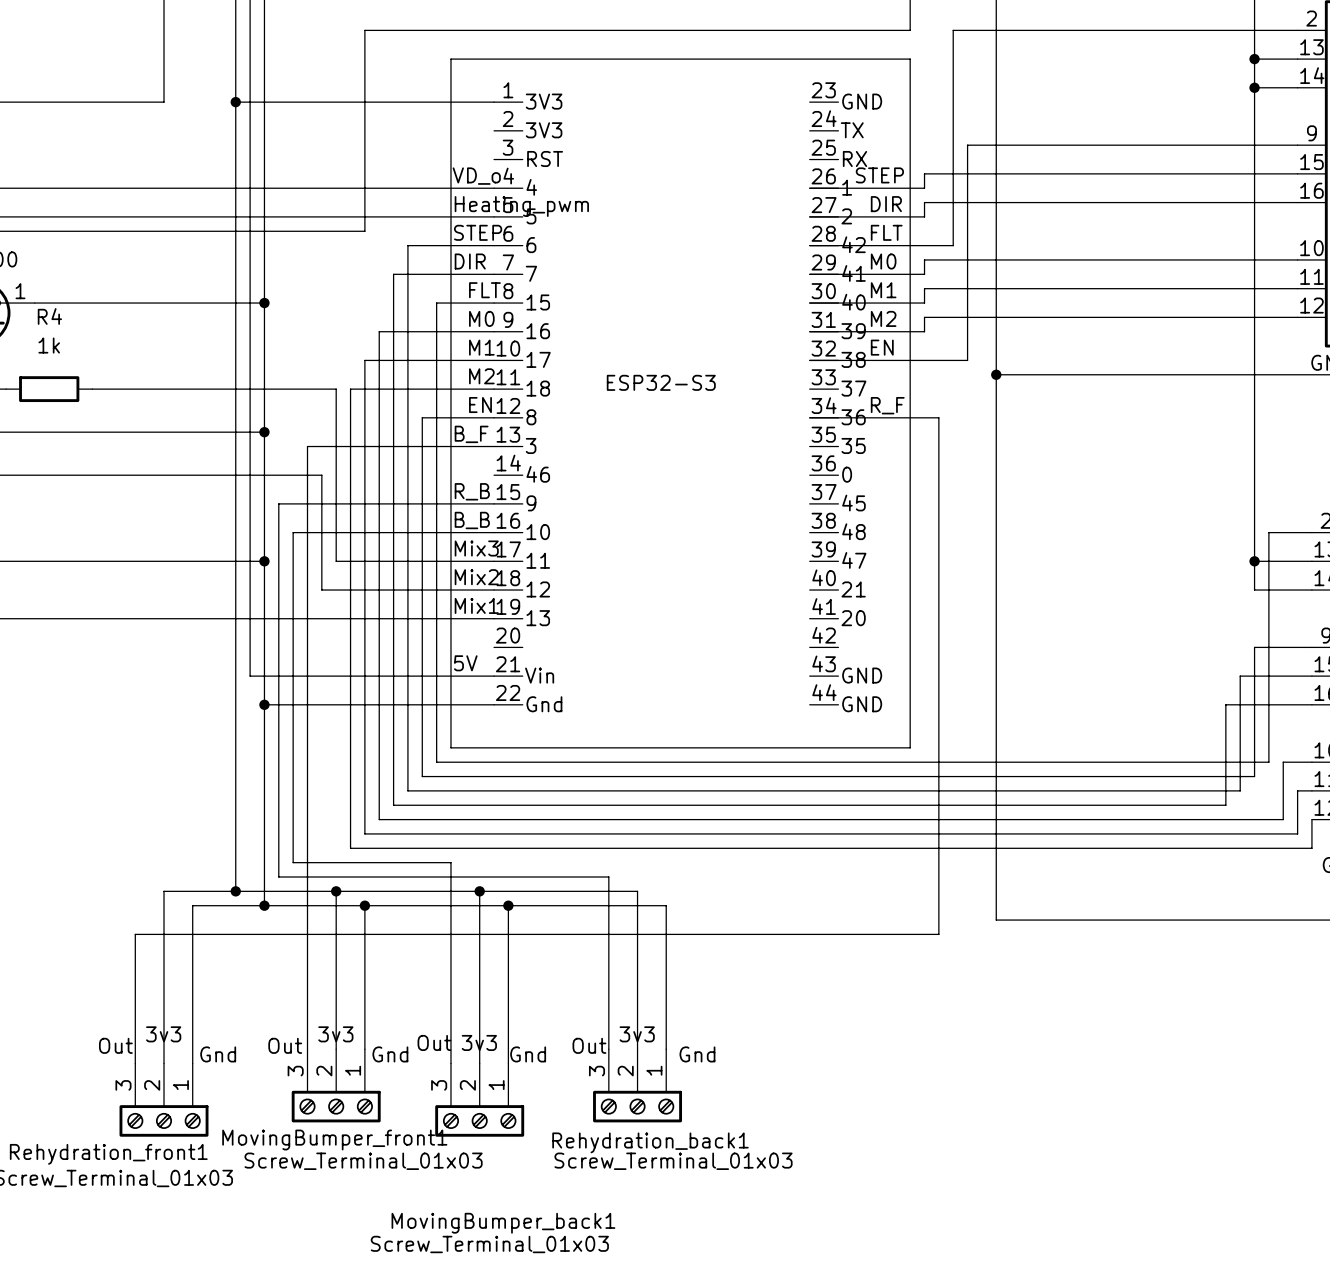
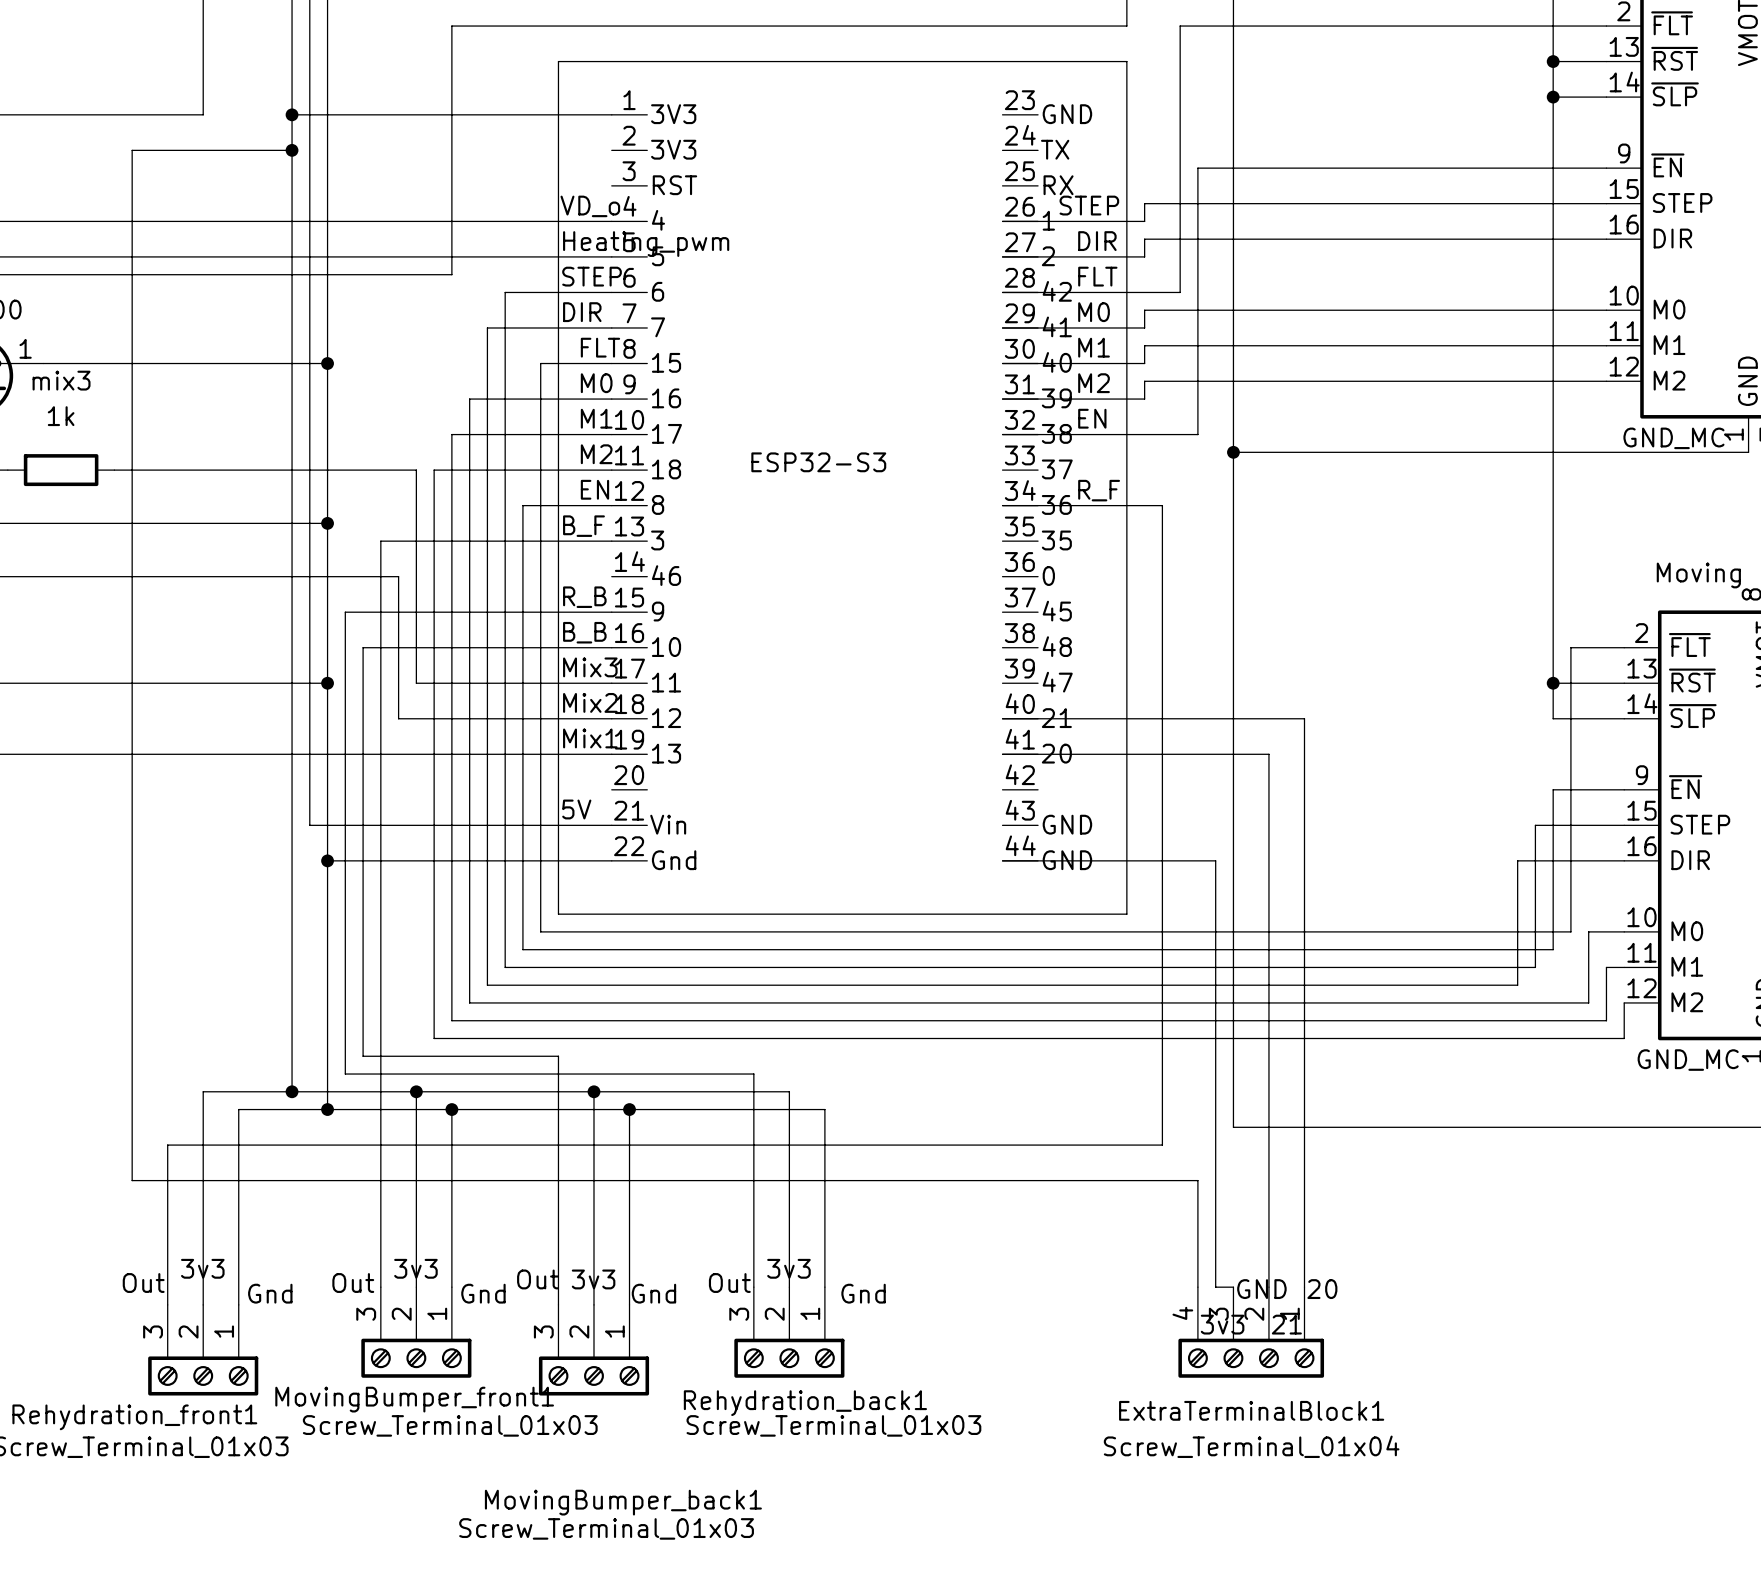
wire: none -> (292, 150) (132, 150) (132, 1180) (1197, 1180) (1197, 1287)
junction: none -> (292, 150)
R4 name: R4 (49, 316) -> mix3 (61, 380)
wire: none -> (1002, 718) (1304, 718) (1304, 1287)
wire: none -> (1002, 754) (1268, 754) (1268, 1287)
wire: none -> (1002, 860) (1215, 860) (1215, 1287) (1233, 1287)
label: none -> GND (1261, 1289)
label: none -> 20 (1322, 1289)
label: none -> 3v3 (1222, 1324)
label: none -> 21 (1286, 1324)
ExtraTerminalBlock1: none -> Screw_Terminal_01x04 (1251, 1332)

